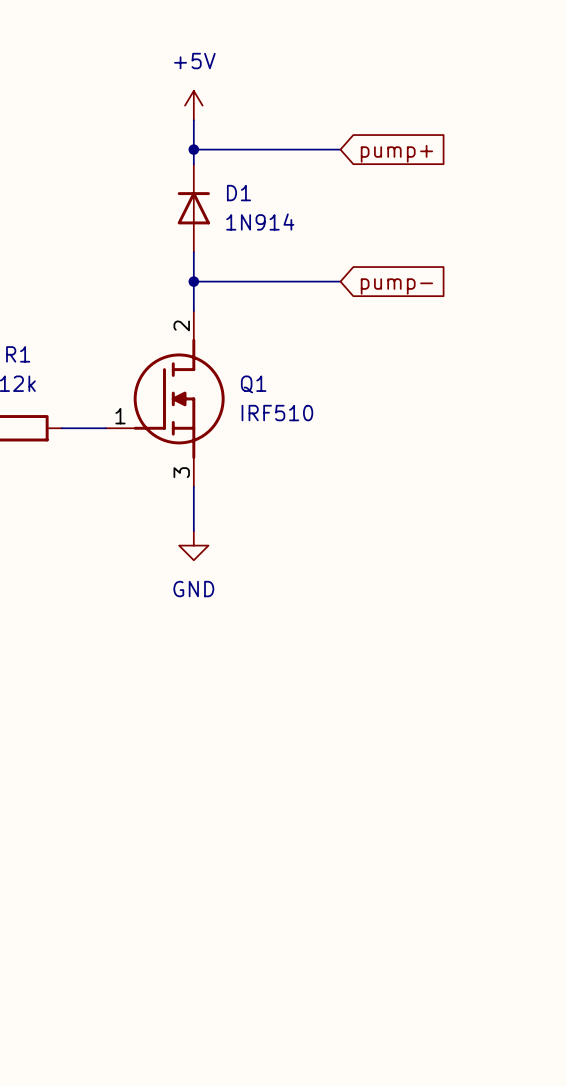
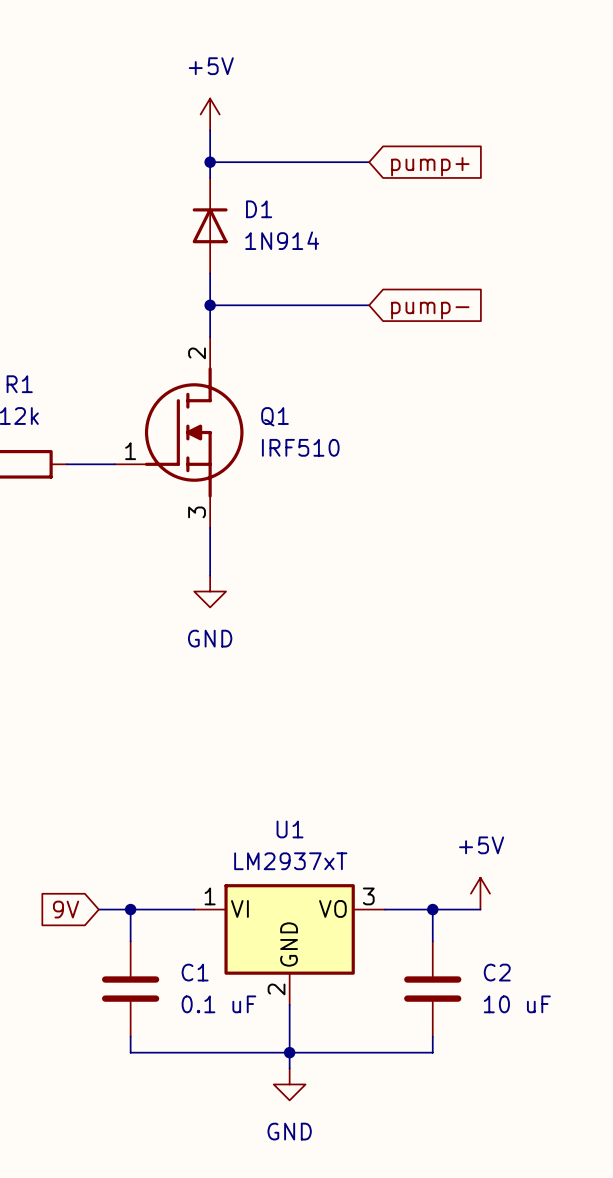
power symbol: none -> +5V (480, 893)
global label: none -> 9V (66, 909)
wire: none -> (98, 909) (194, 909)
wire: none -> (130, 909) (130, 941)
junction: none -> (130, 909)
wire: none -> (385, 909) (480, 909)
wire: none -> (432, 909) (432, 941)
junction: none -> (432, 909)
U1: none -> LM2937xT (289, 944)
C1: none -> 0.1 uF (130, 989)
C2: none -> 10 uF (432, 989)
wire: none -> (289, 1004) (289, 1068)
wire: none -> (130, 1036) (130, 1052) (432, 1052) (432, 1036)
junction: none -> (289, 1052)
power symbol: none -> GND (289, 1084)

